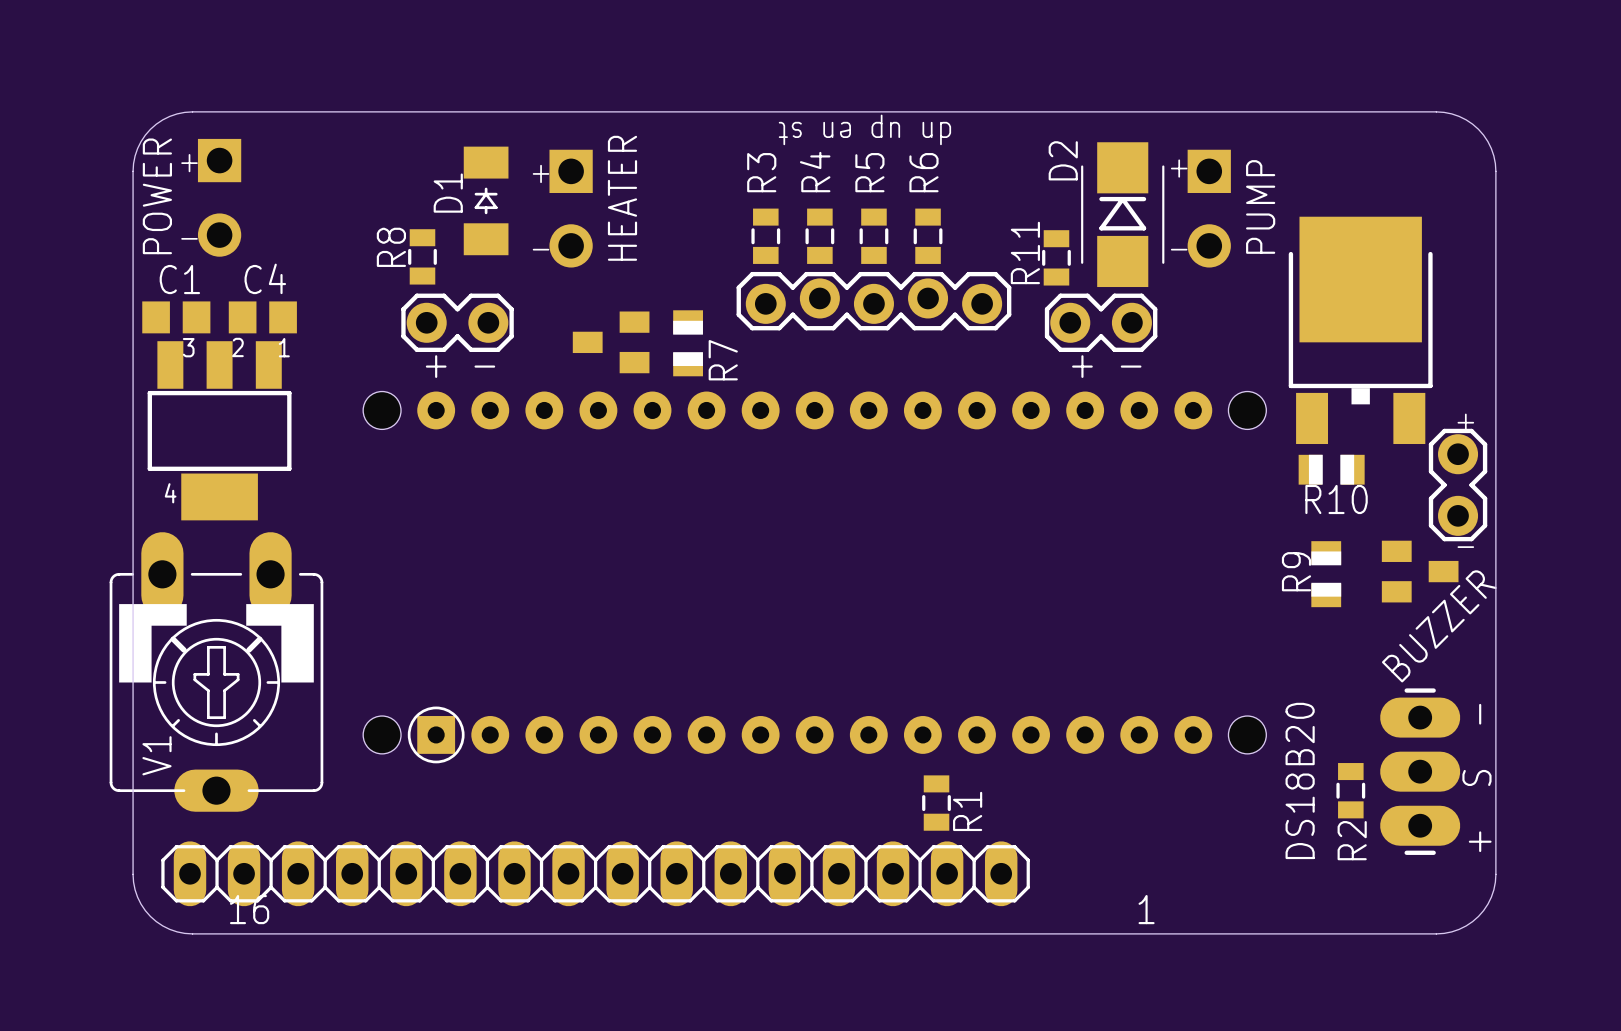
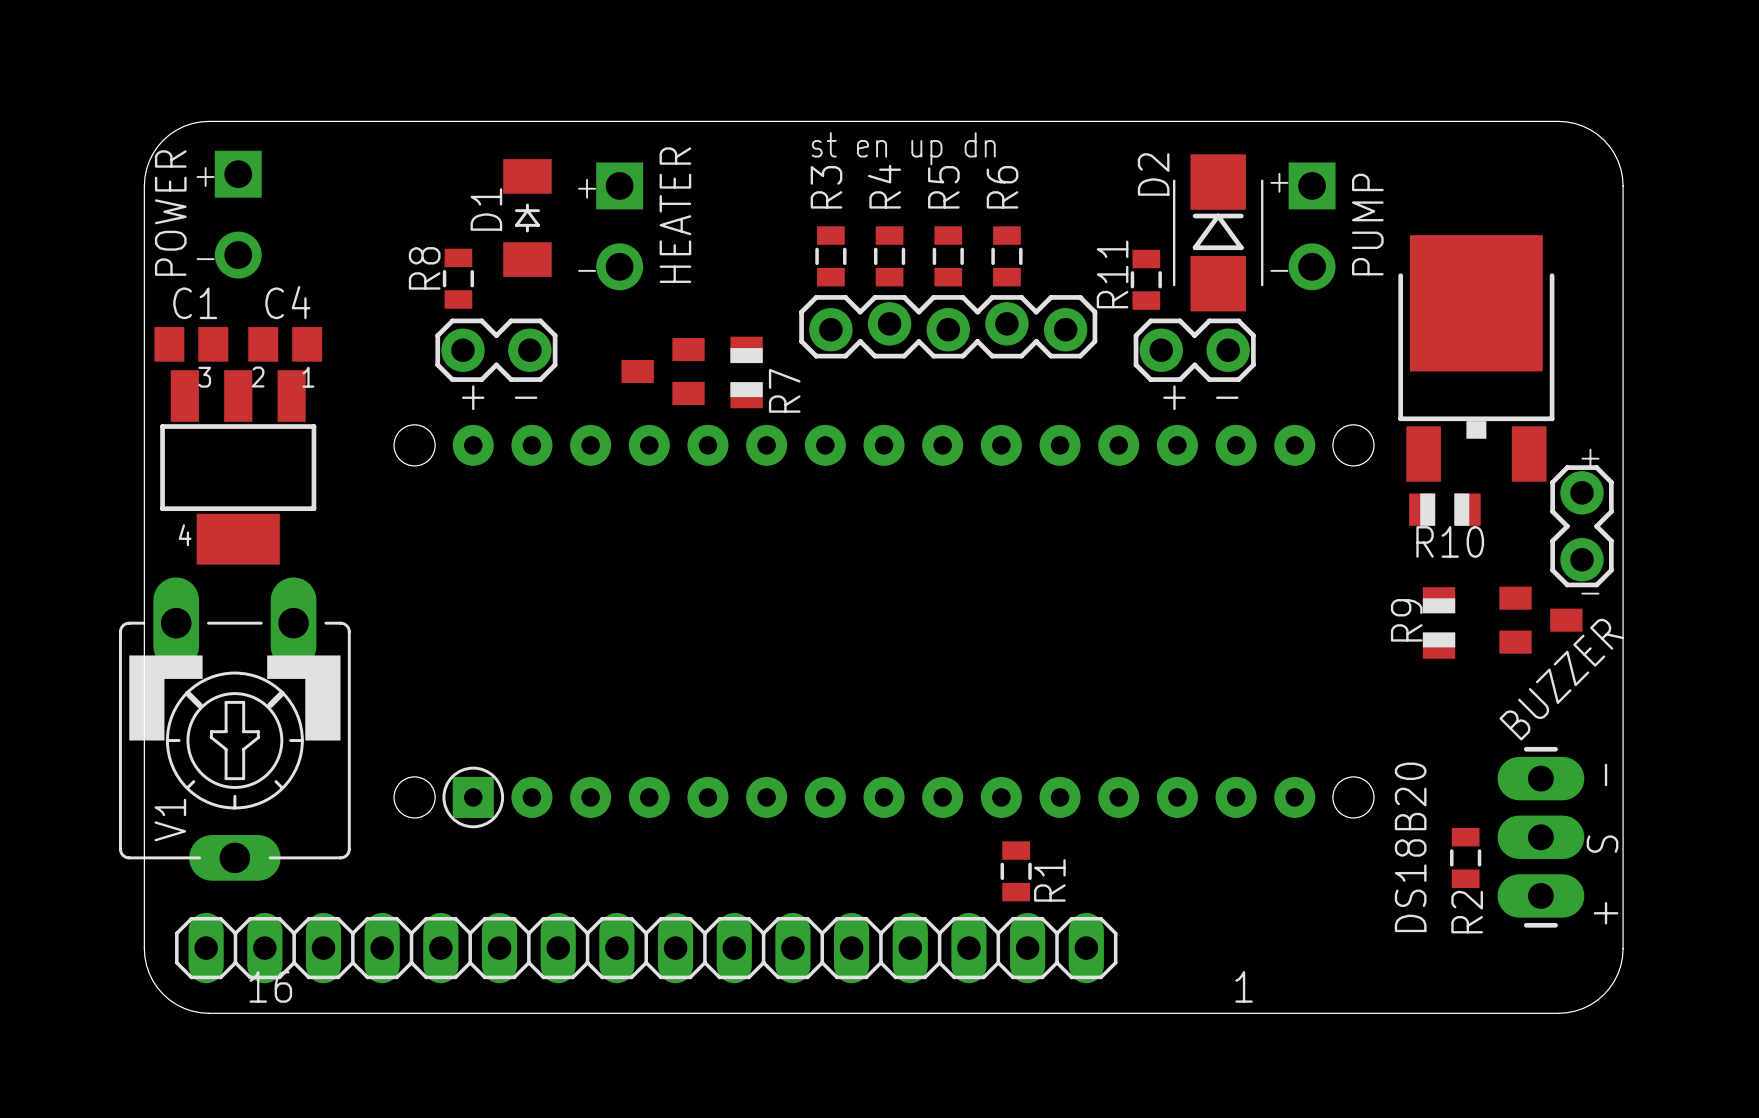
text: dn up en st (864, 129) -> none
text: none -> st en up dn (903, 148)

